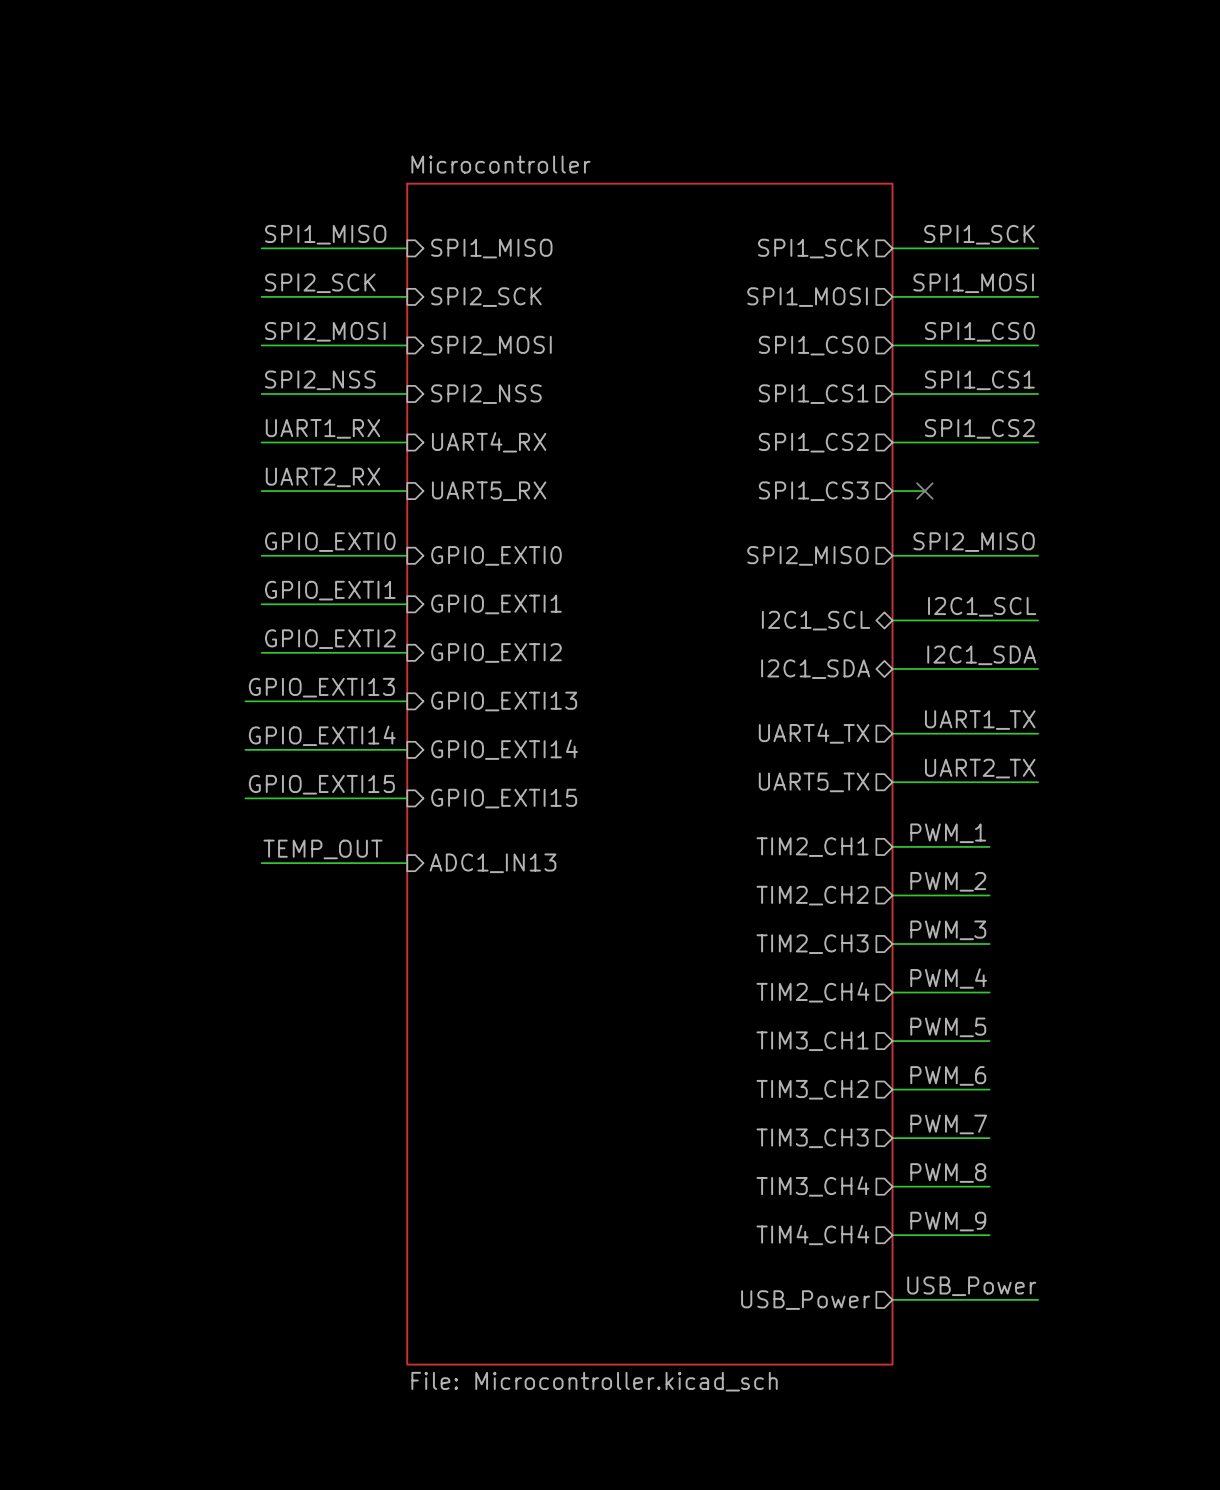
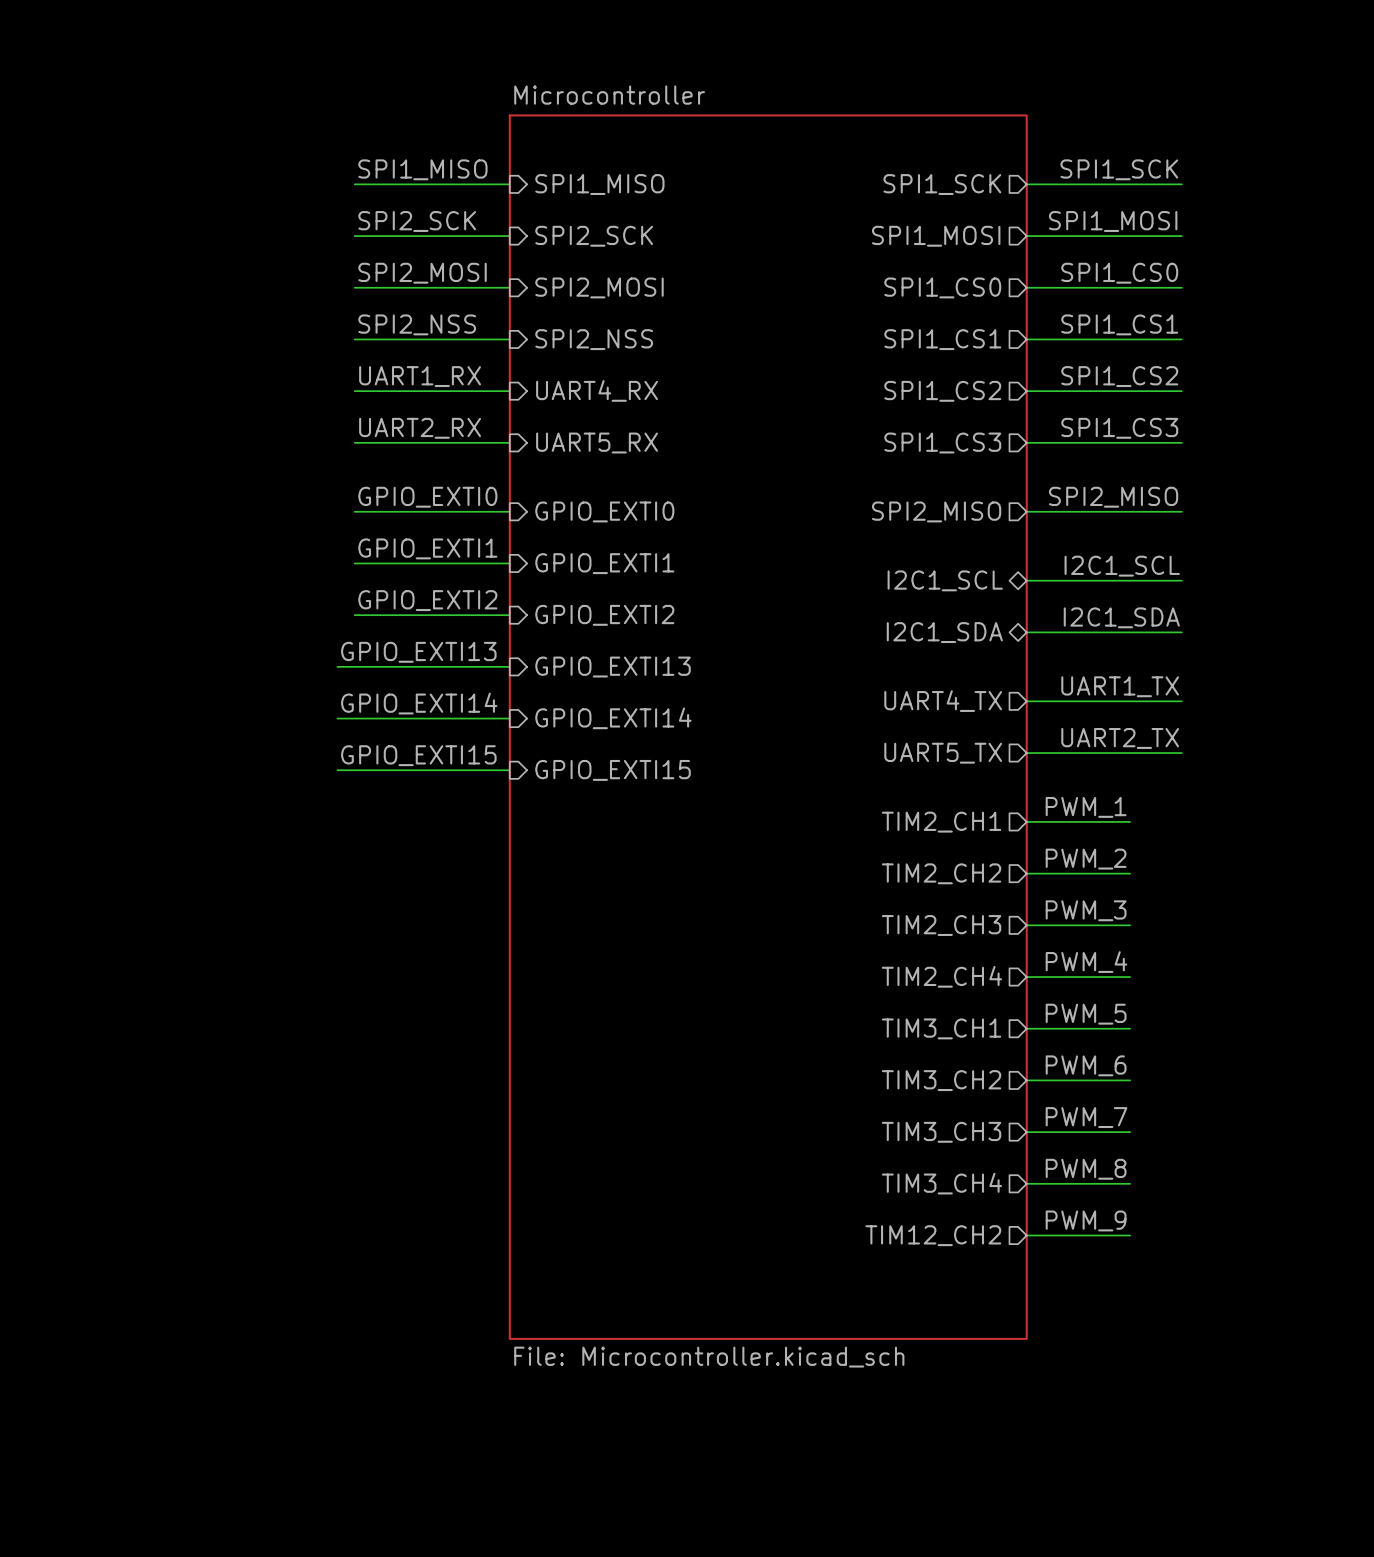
label: none -> SPI1_CS3 (1119, 428)
wire: none -> (1061, 442) (1181, 442)
no-connect mark: (924, 491) -> none
sheet Microcontroller: none -> File: Microcontroller.kicad_sch (768, 727)
sheet Microcontroller: File: Microcontroller.kicad_sch (649, 774) -> none
label: TEMP_OUT (322, 849) -> none
wire: (261, 863) (407, 863) -> none
sheet pin: ADC1_IN13 (492, 863) -> none
sheet pin: TIM4_CH4 (812, 1234) -> TIM12_CH2 (933, 1235)
label: USB_Power (971, 1286) -> none
wire: (892, 1299) (1038, 1299) -> none
sheet pin: USB_Power (805, 1300) -> none

